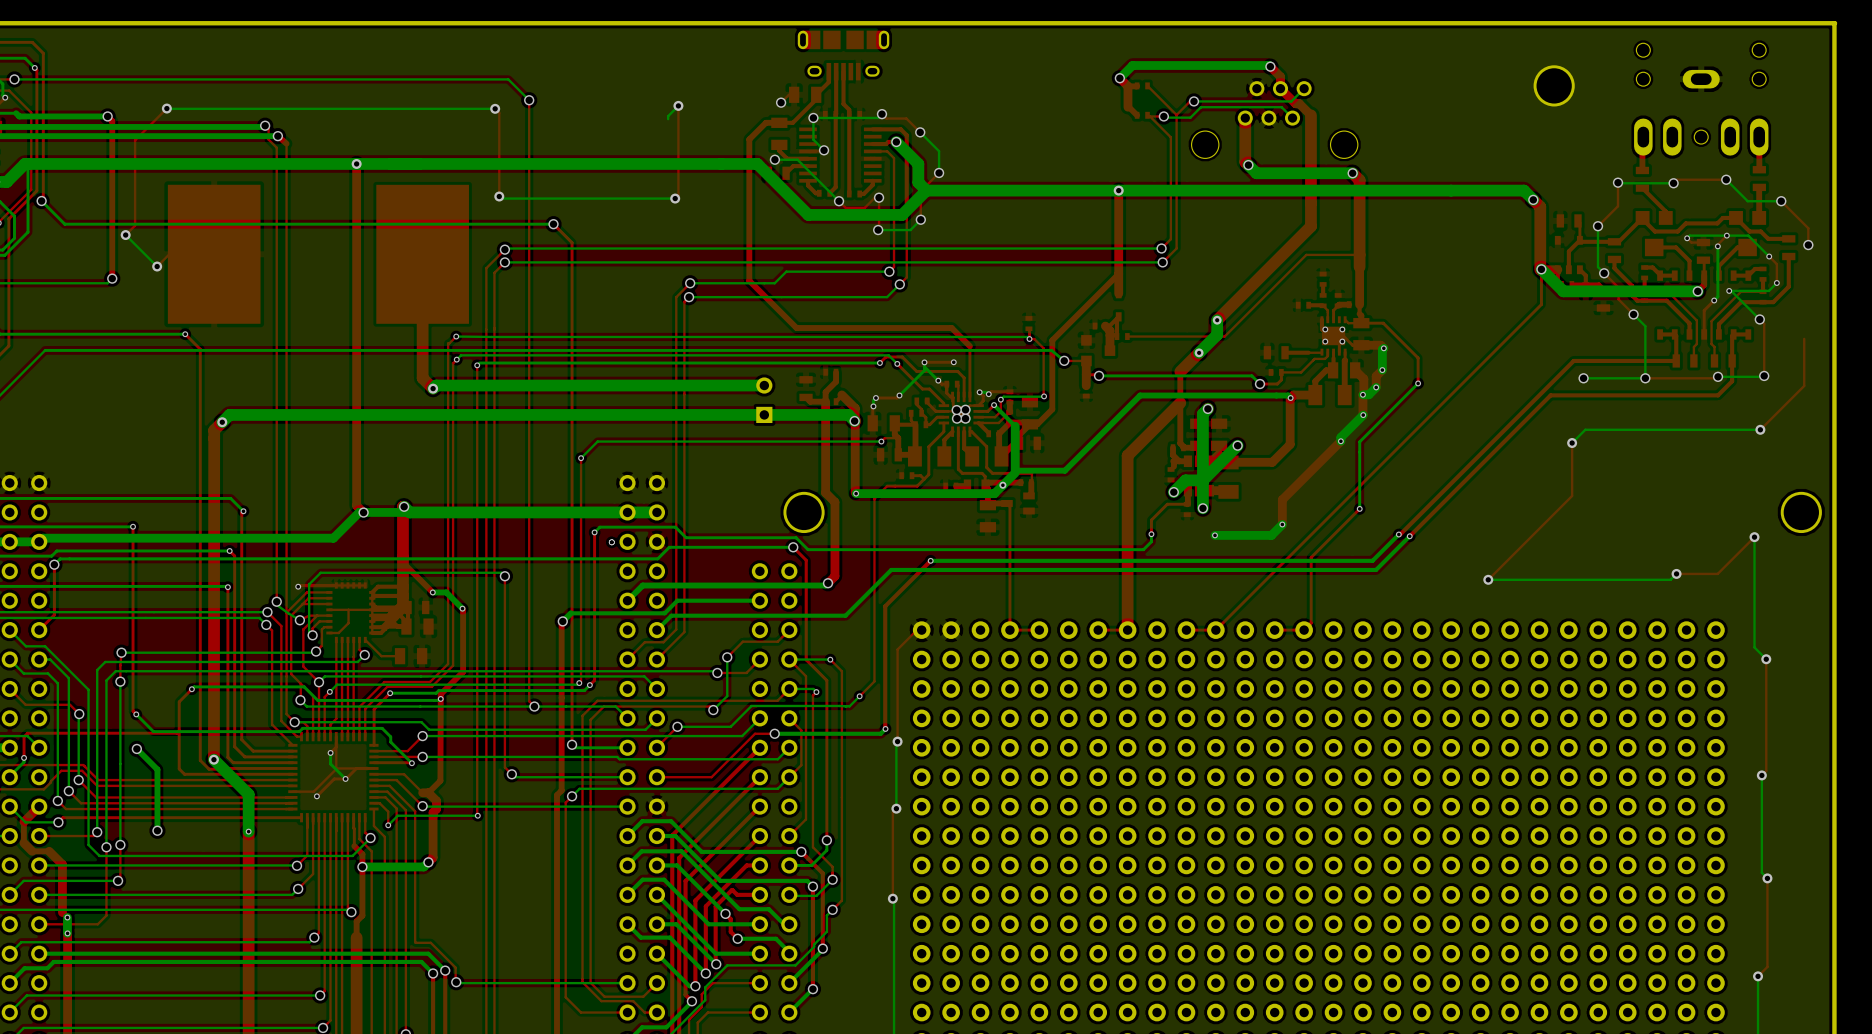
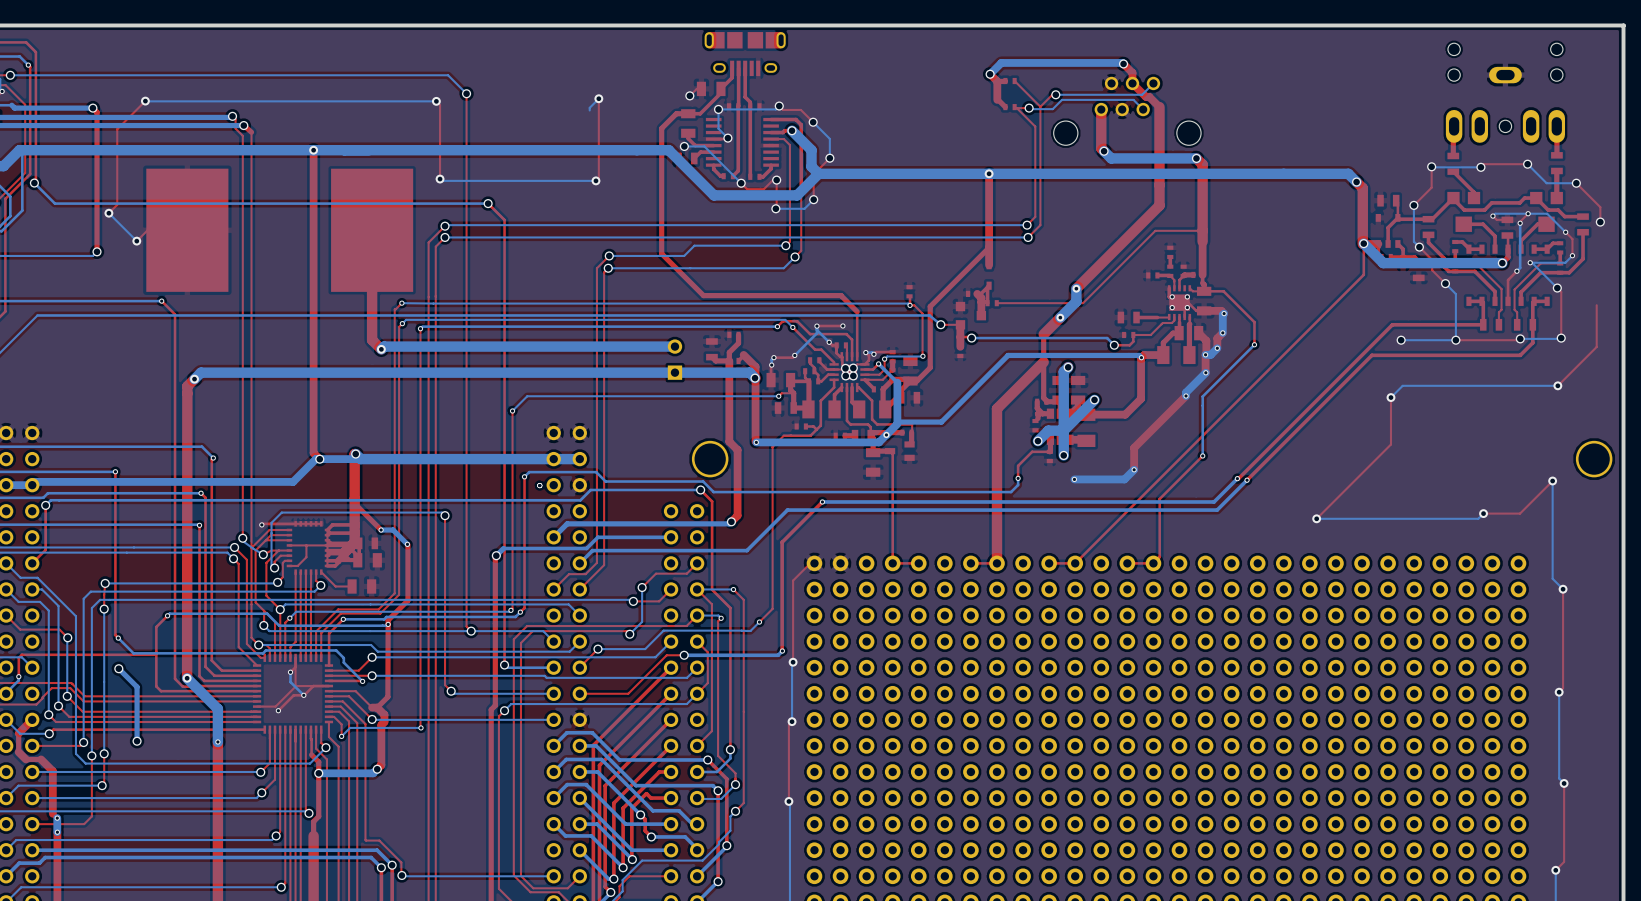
part: (1554, 85) -> none

